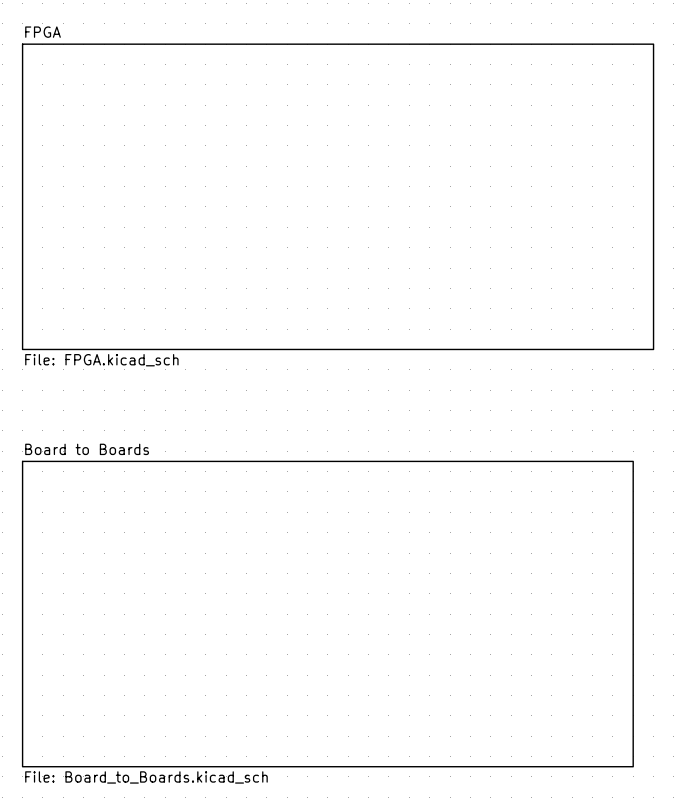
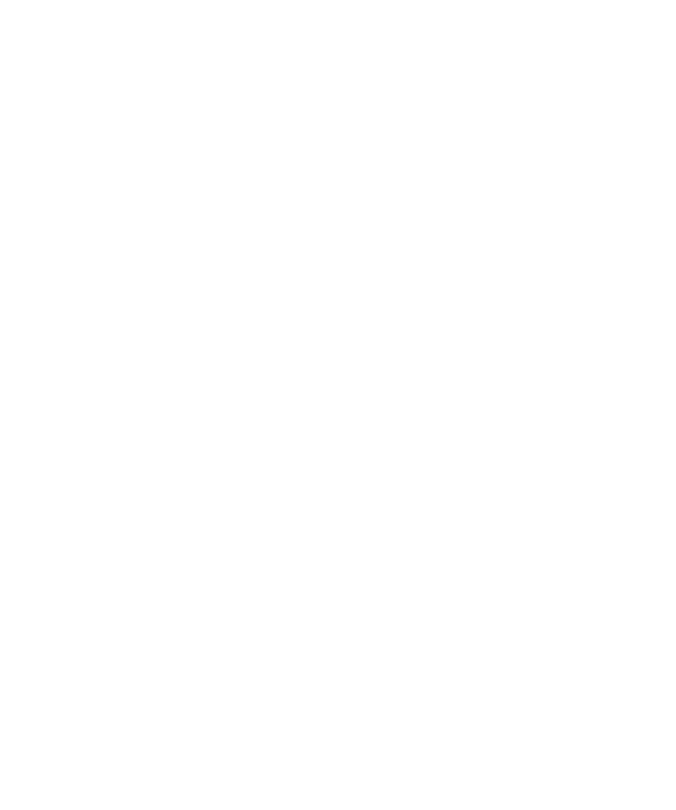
sheet FPGA: File: FPGA.kicad_sch (338, 196) -> none
sheet Board to Boards: File: Board_to_Boards.kicad_sch (327, 614) -> none

